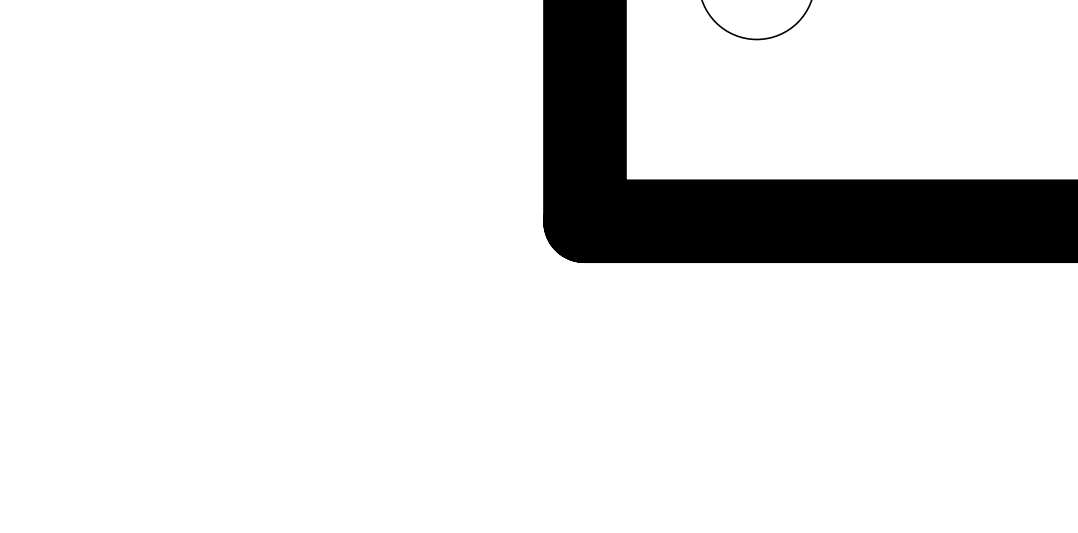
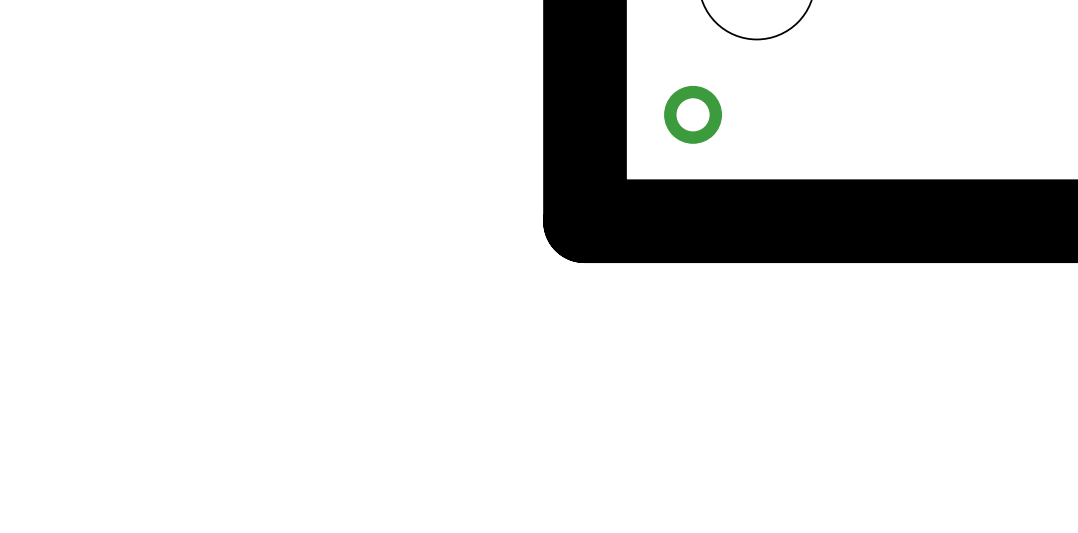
via: none -> (693, 114)

